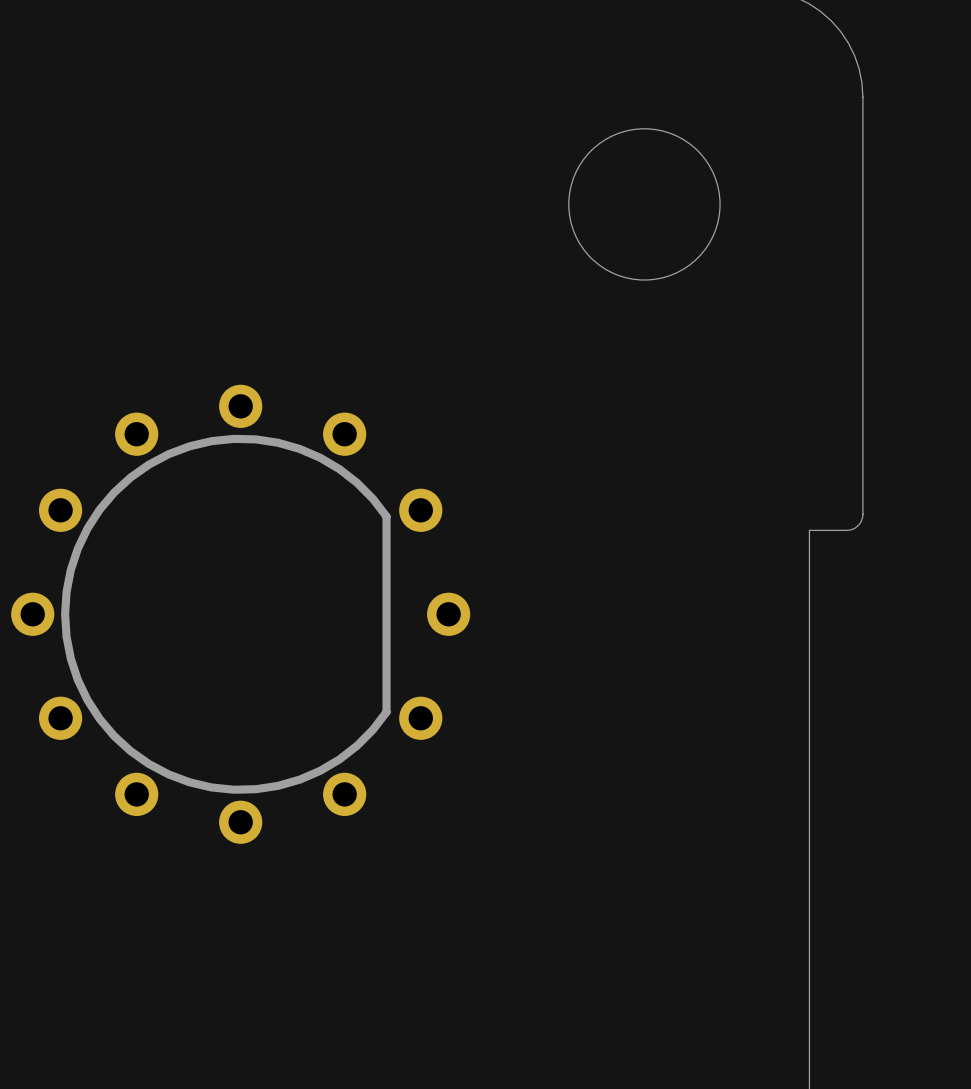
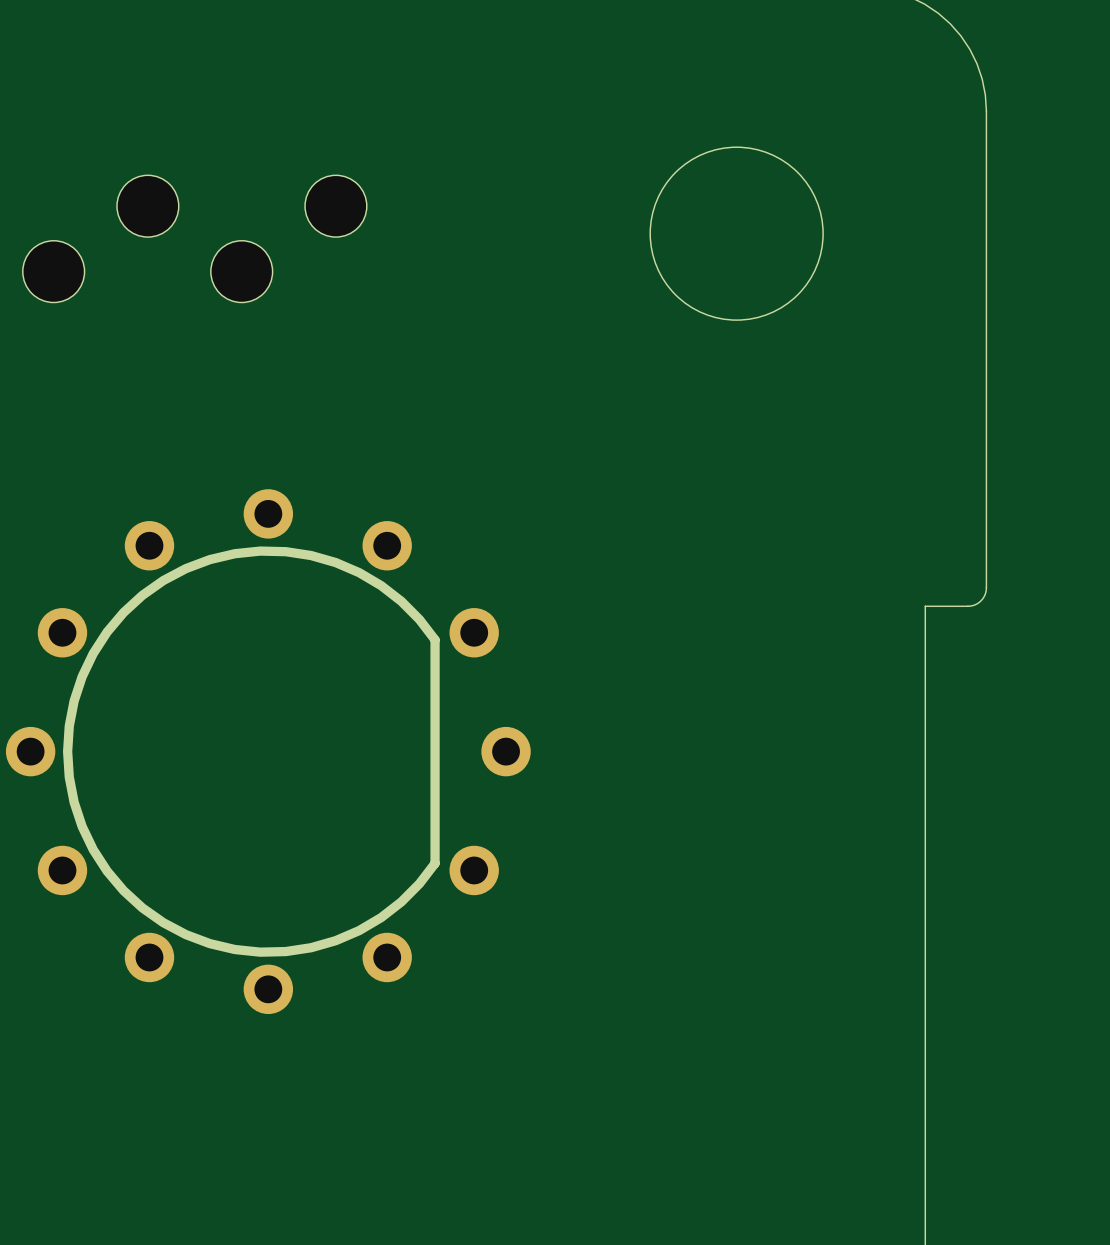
part: none -> (147, 206)
part: none -> (335, 206)
part: none -> (53, 271)
part: none -> (241, 271)
part position: (240, 614) -> (268, 751)

